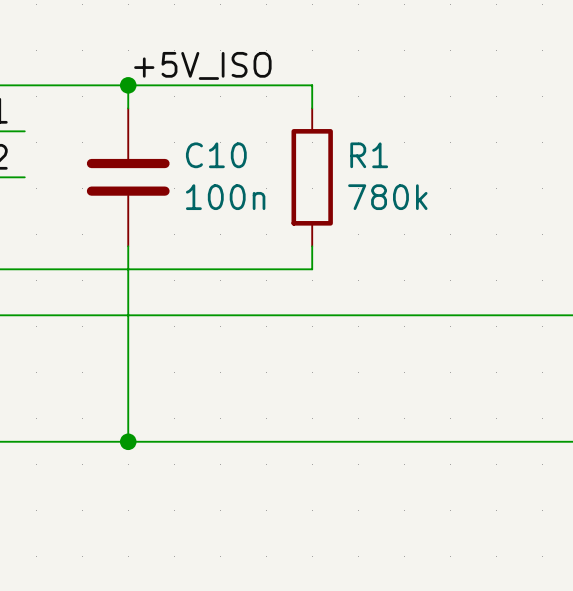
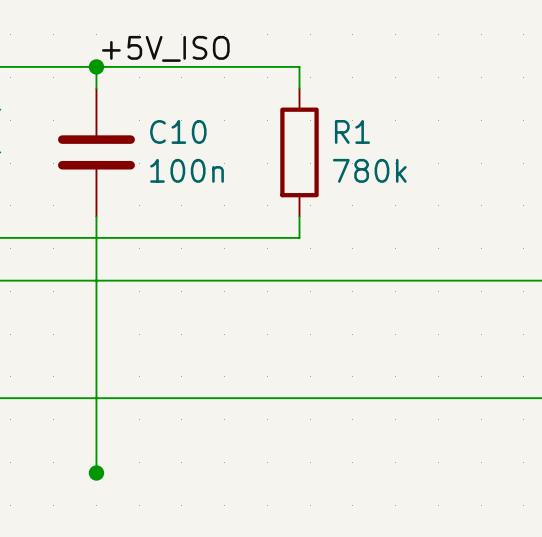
wire: (312, 85) (312, 108) -> (267, 66) (299, 66) (299, 88)
R1 position: (312, 177) -> (299, 152)
wire: (312, 246) (312, 269) -> (299, 216) (299, 237) (267, 237)
wire: none -> (96, 398) (96, 472)
junction: (128, 441) -> none
junction: none -> (96, 472)

